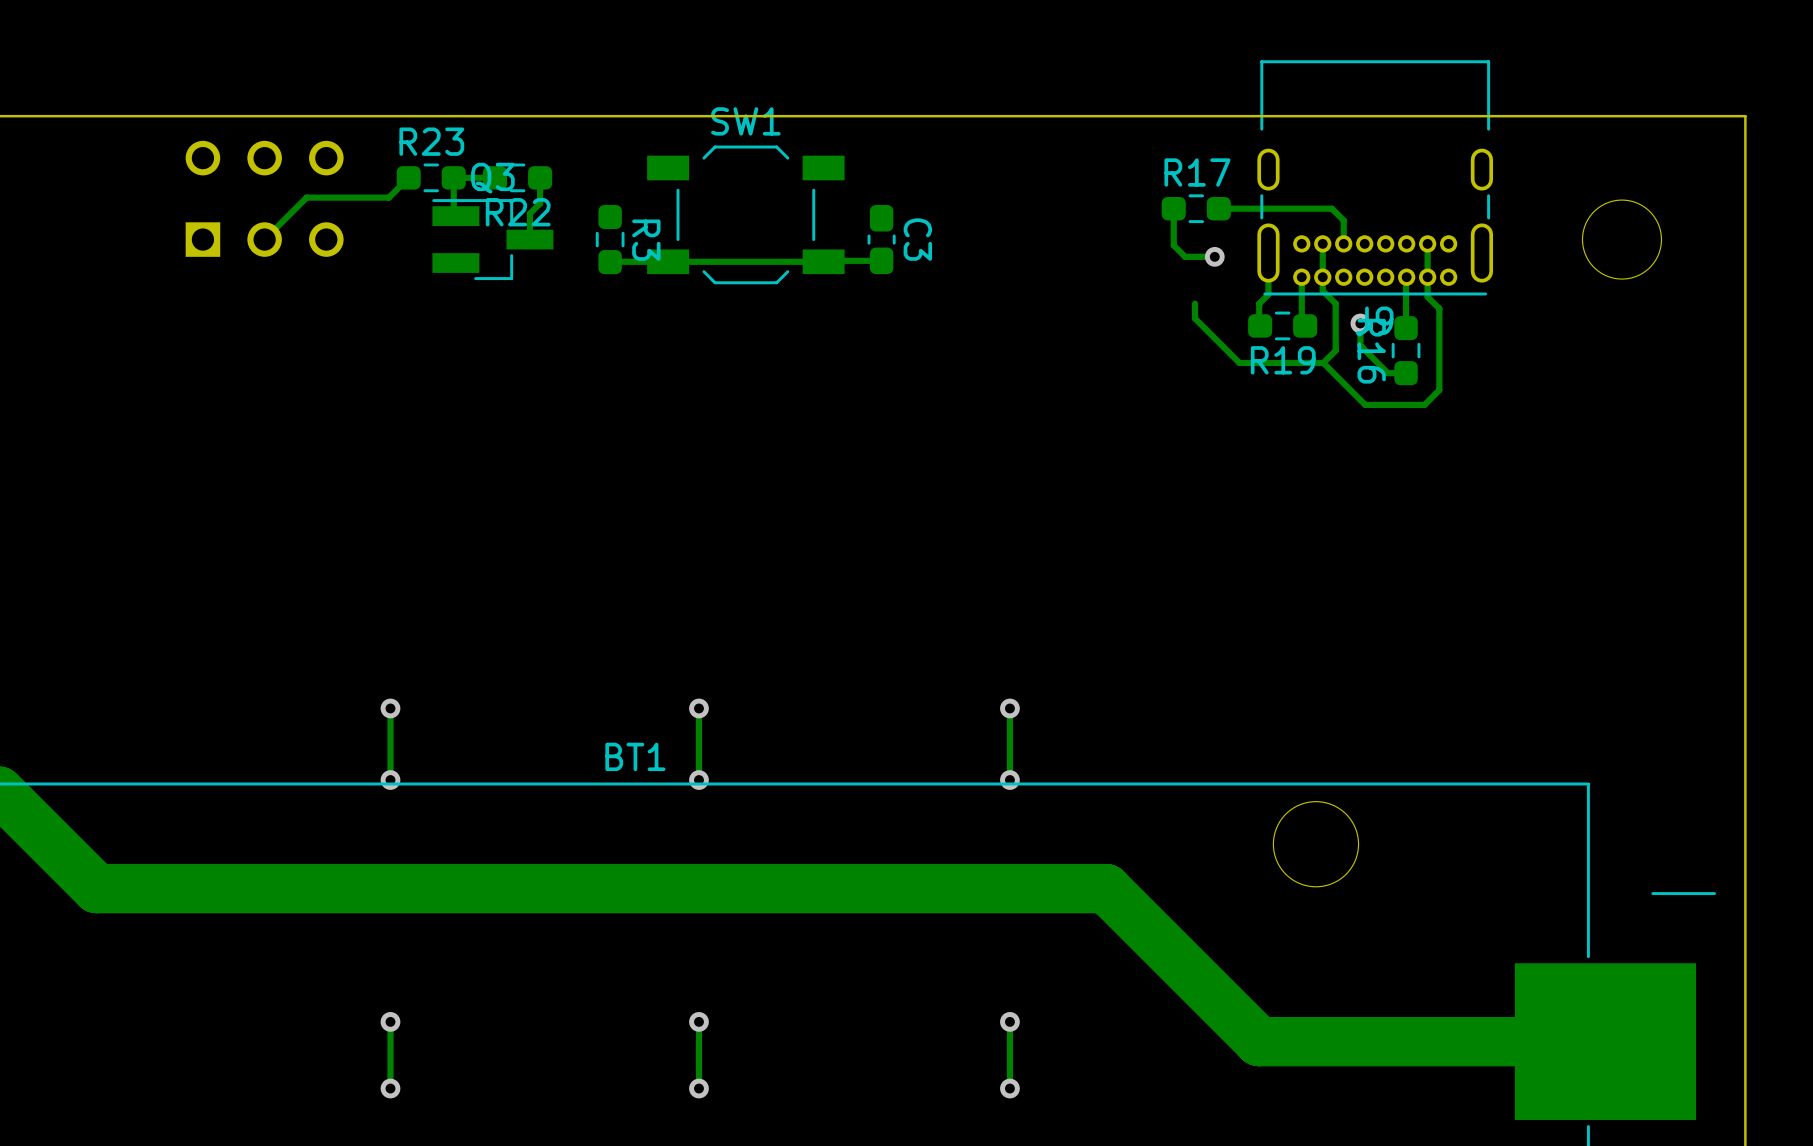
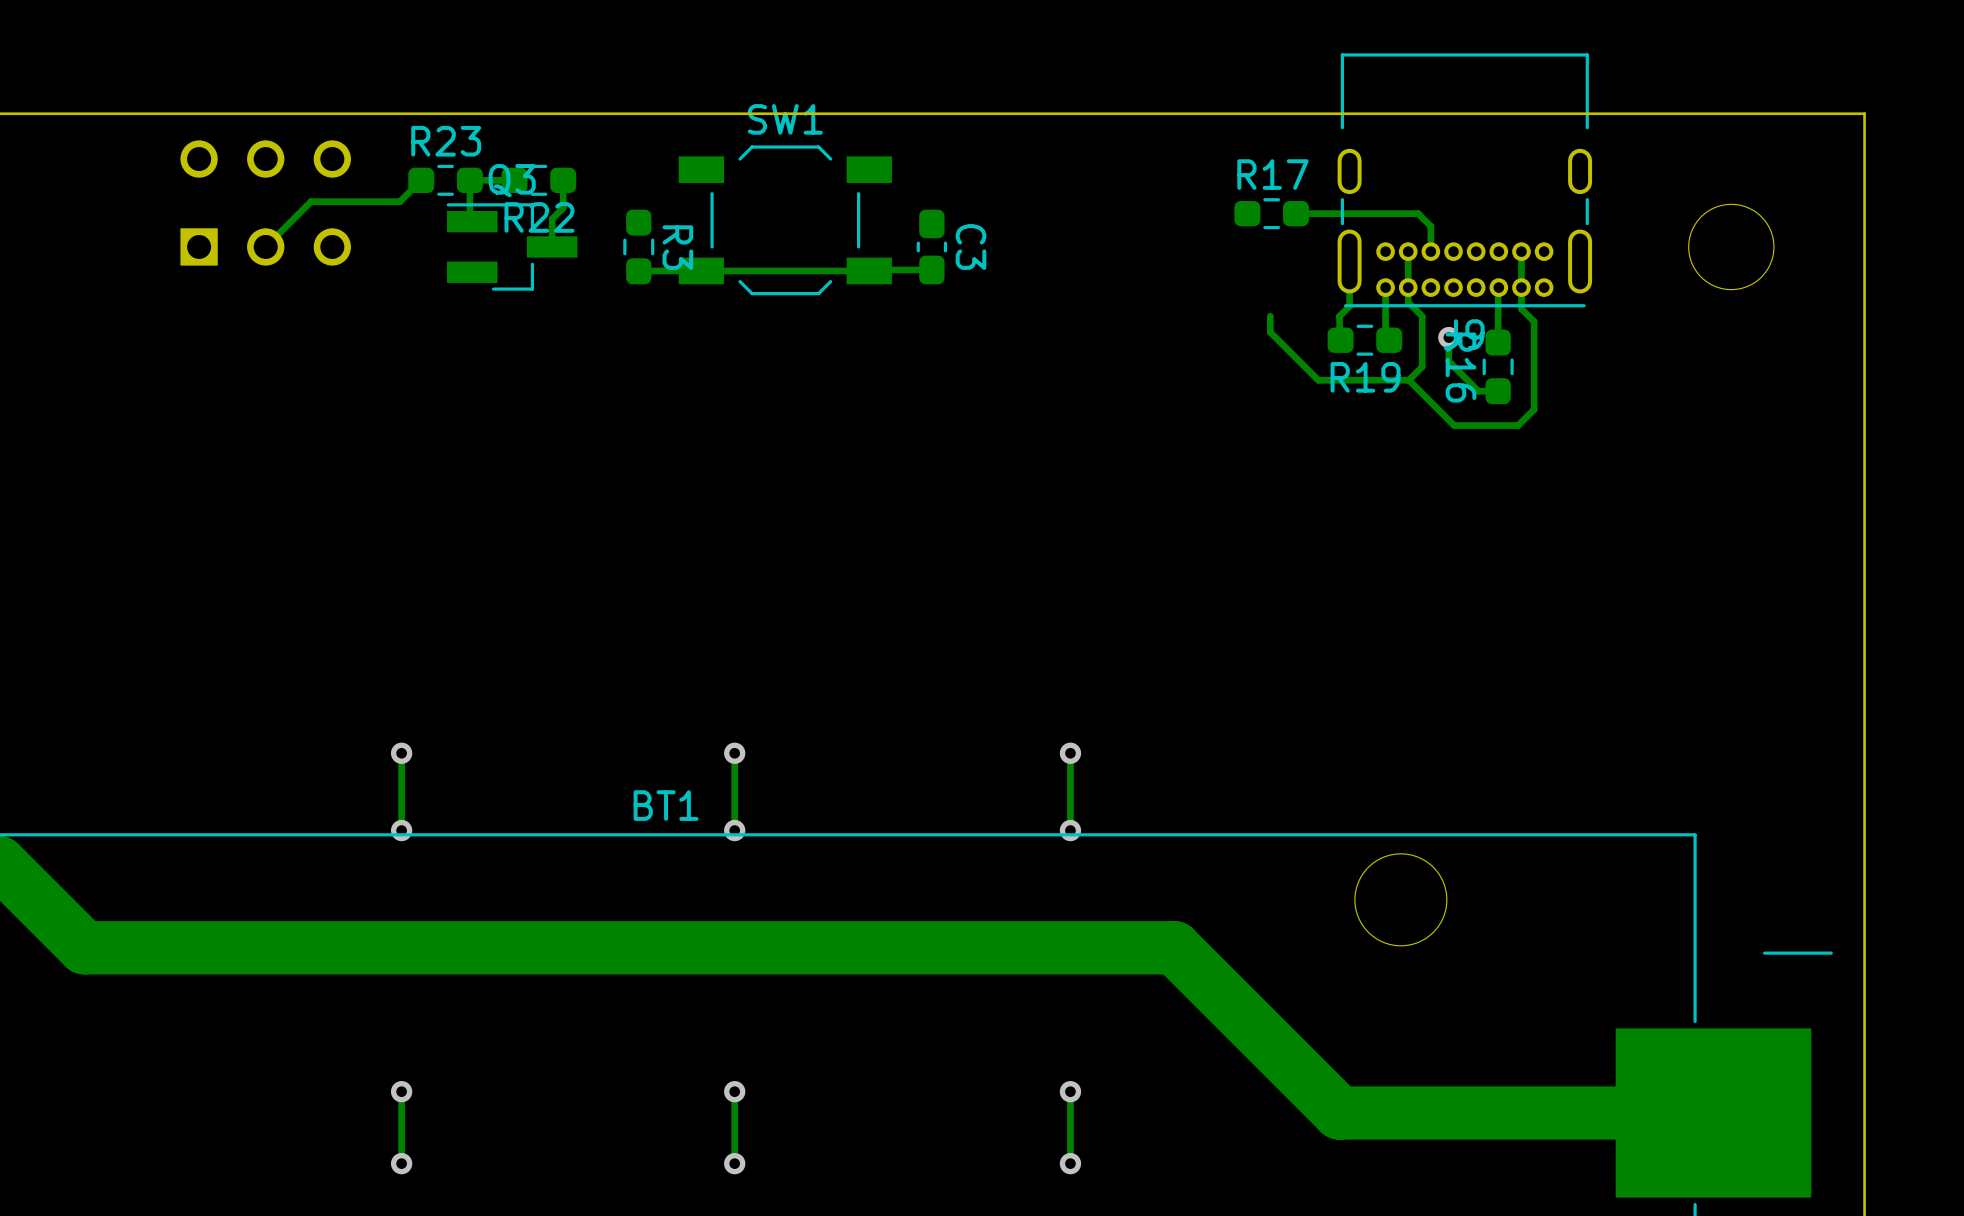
track: (1173, 208) (1173, 245) (1185, 256) (1214, 256) -> none
via: (1214, 256) -> none

